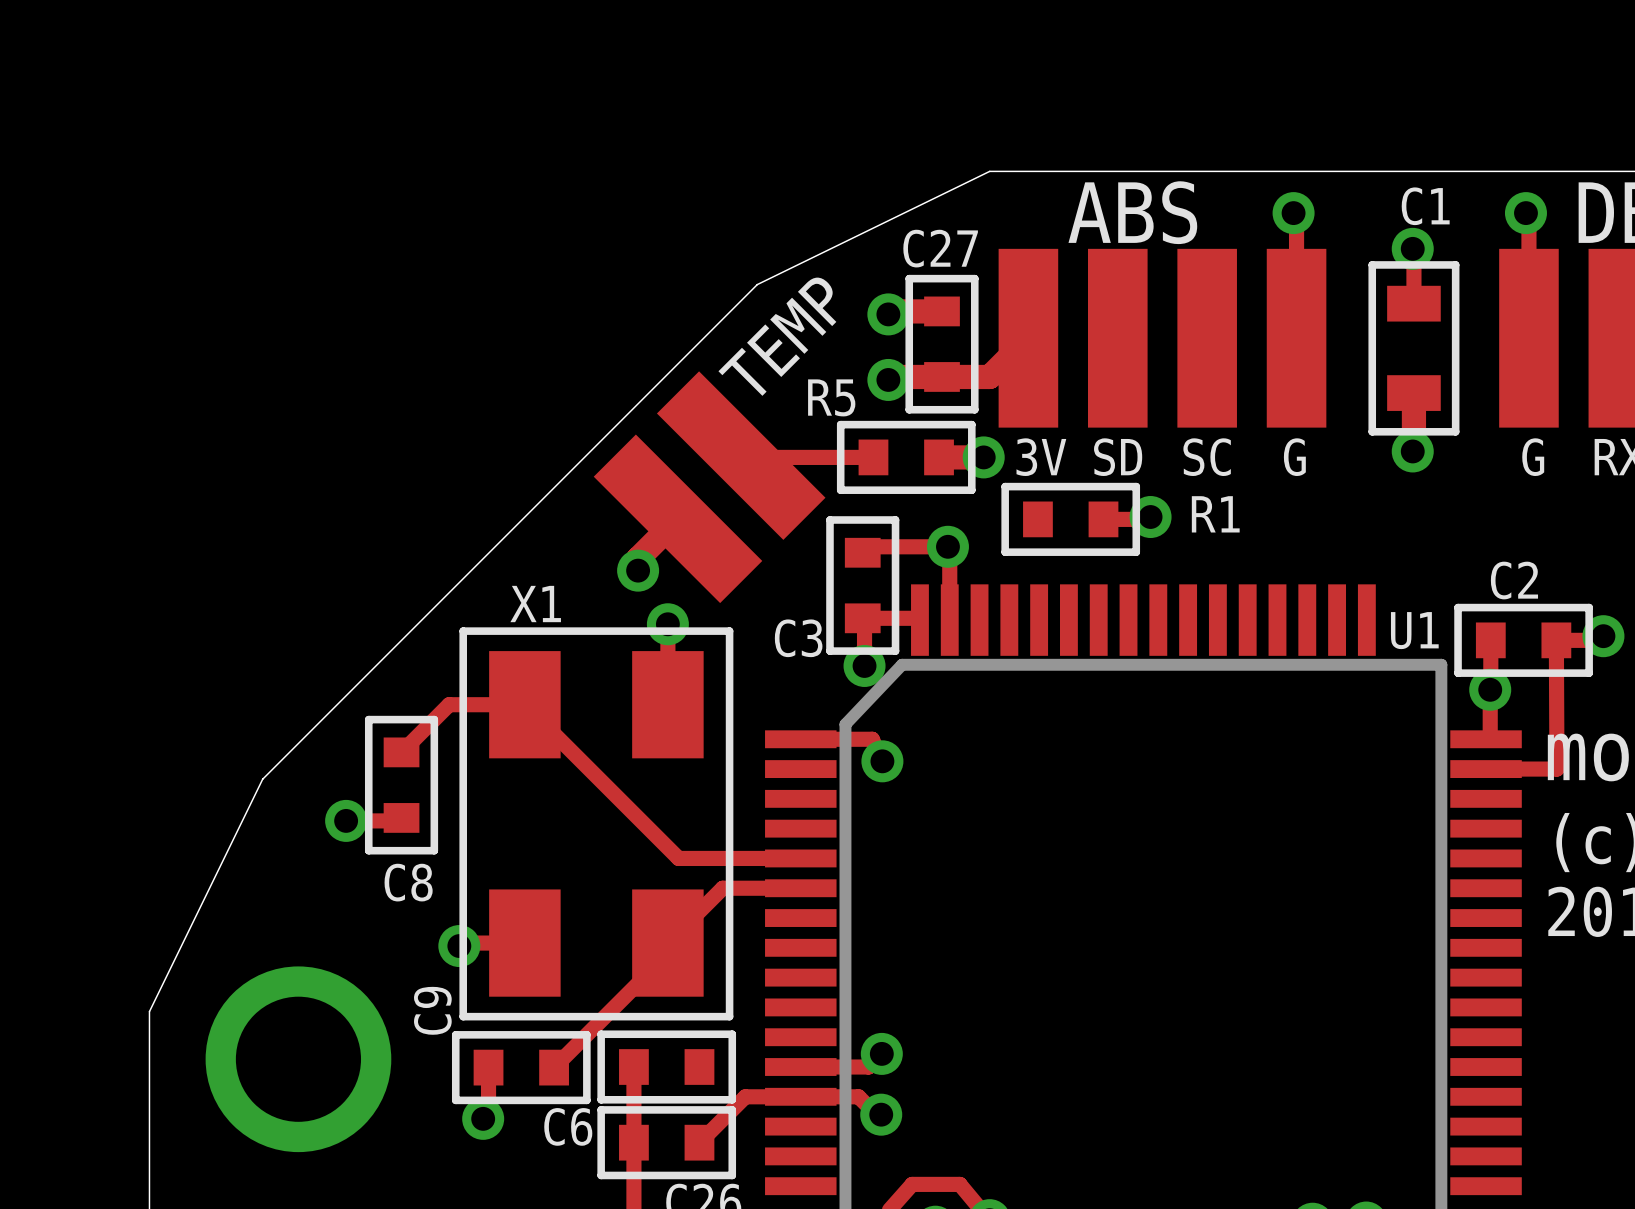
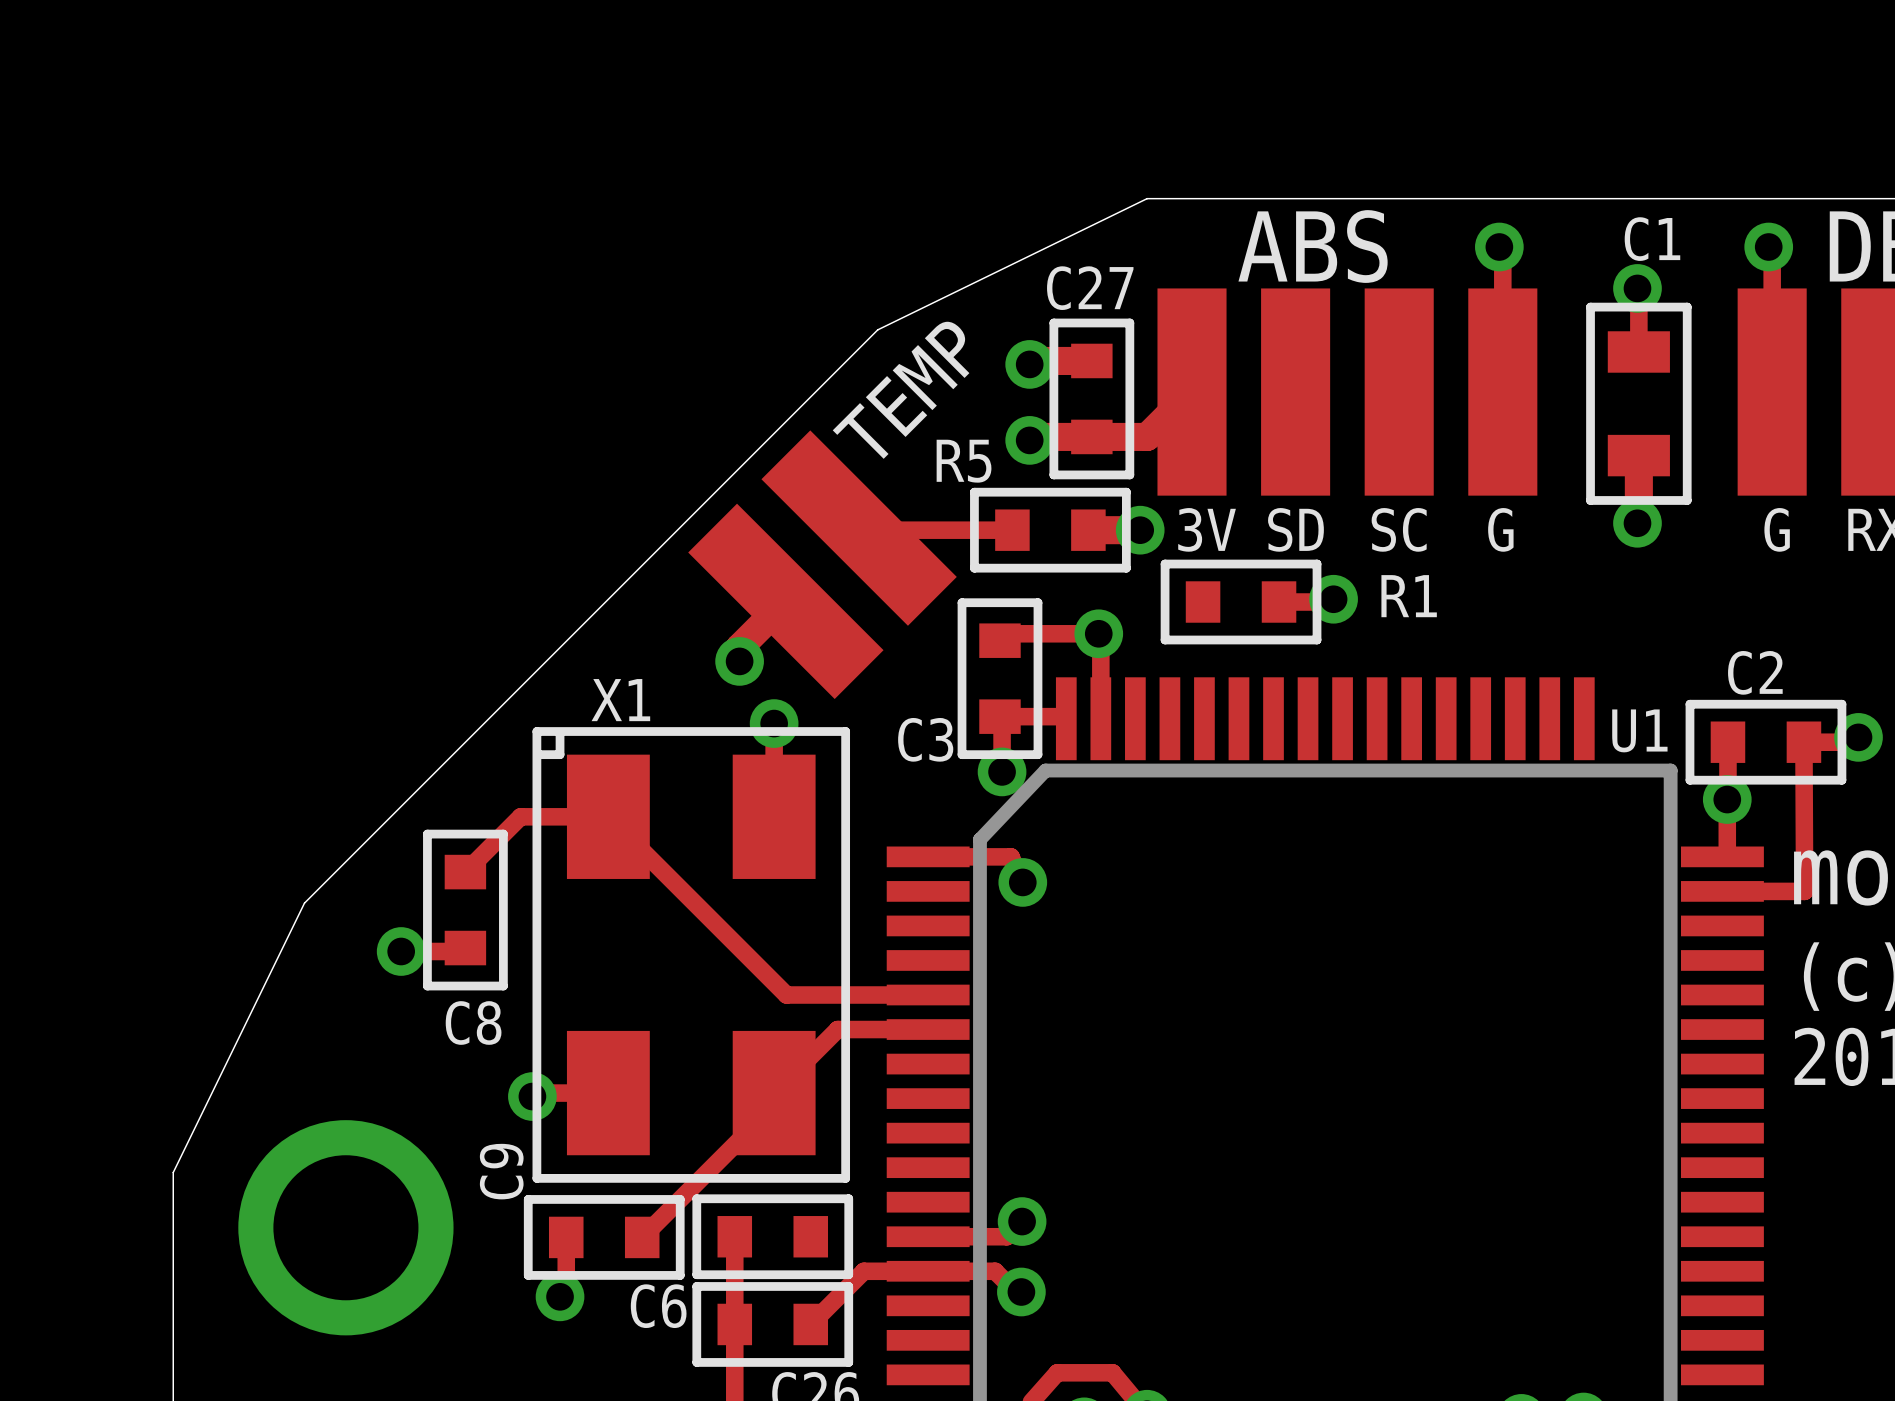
X1 footprint: [459, 627, 734, 1021] -> [532, 727, 851, 1183]

